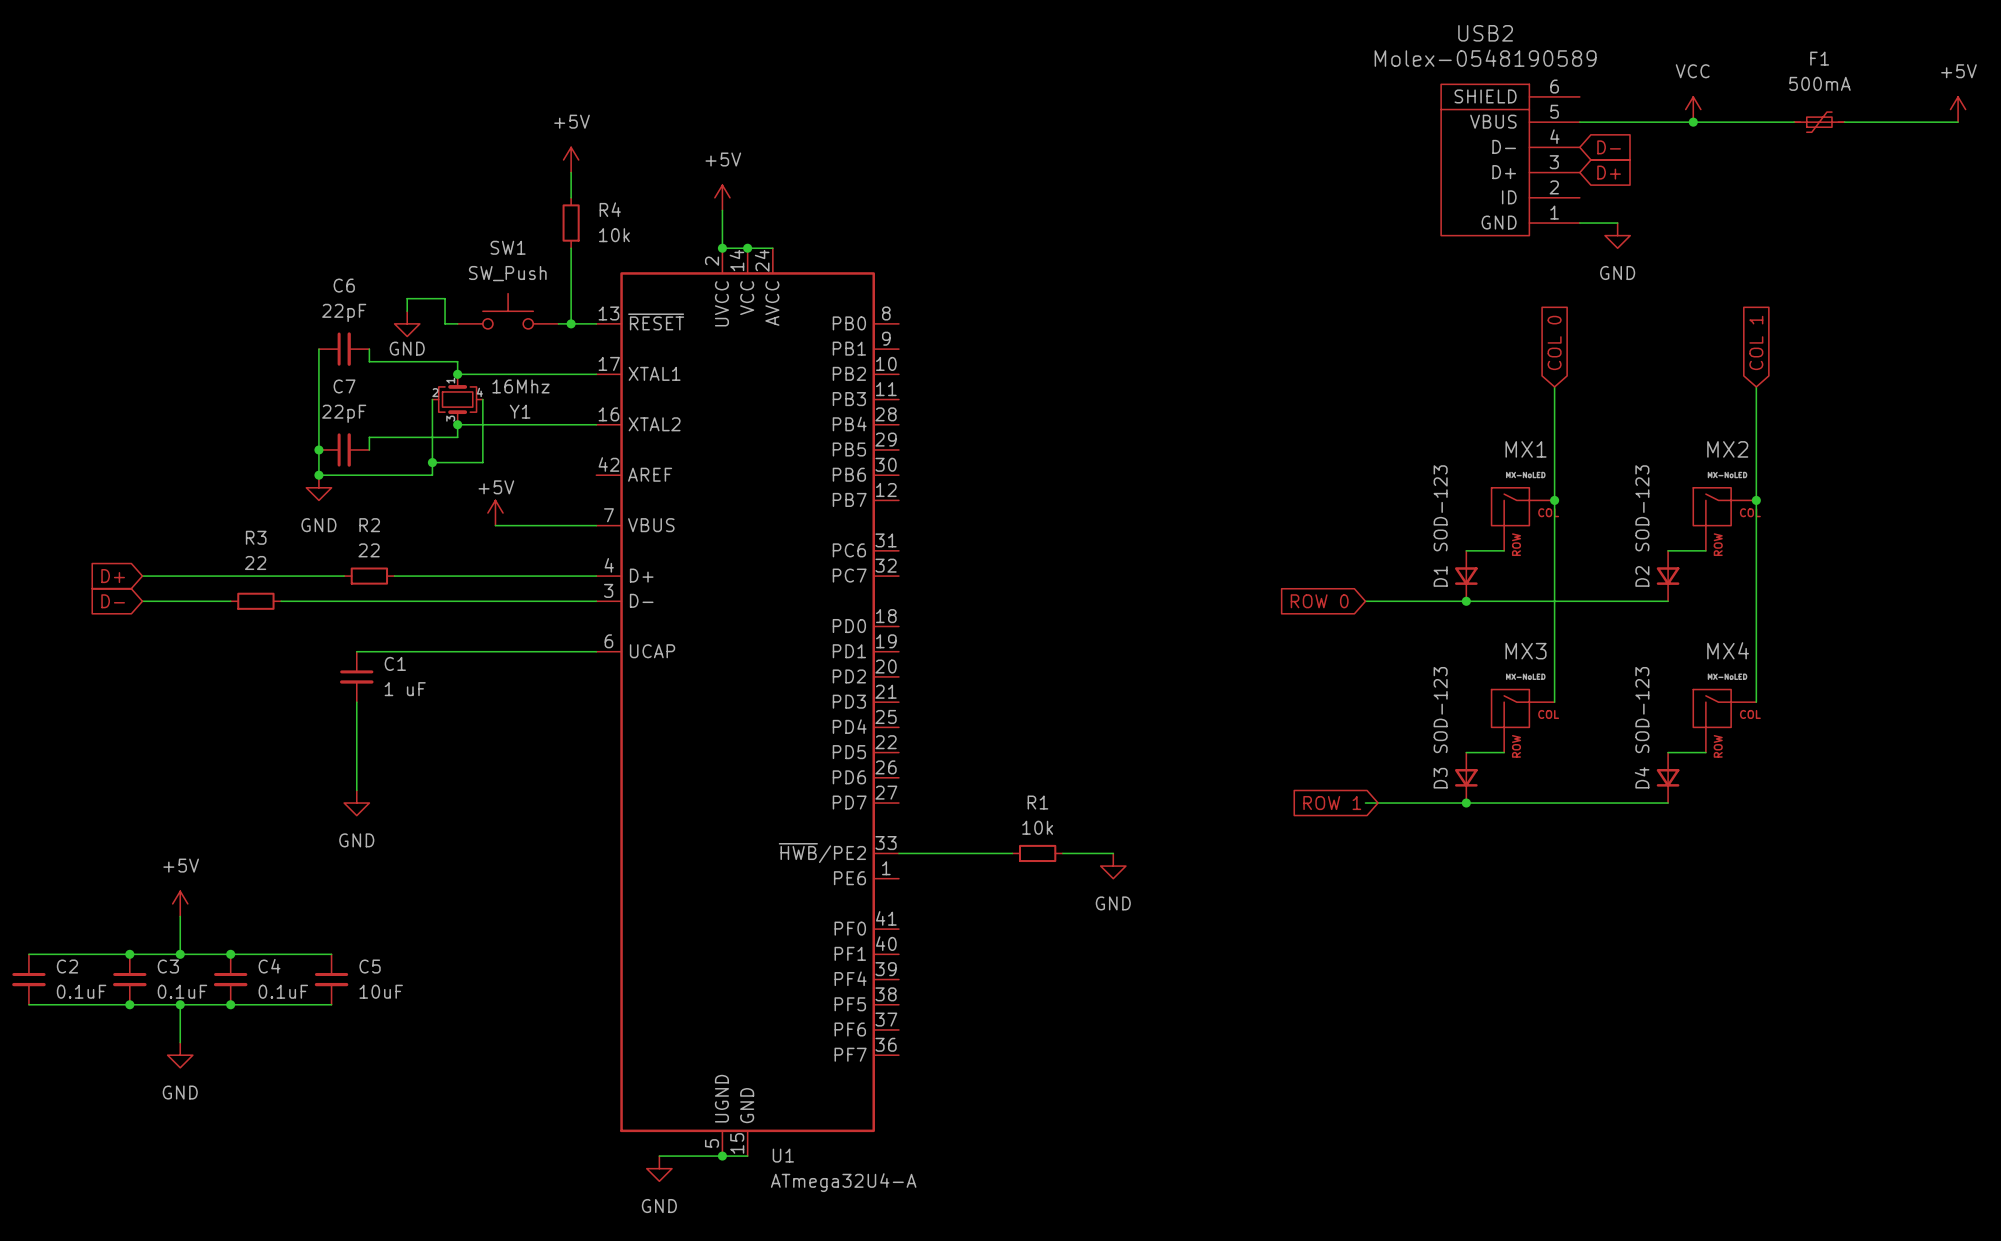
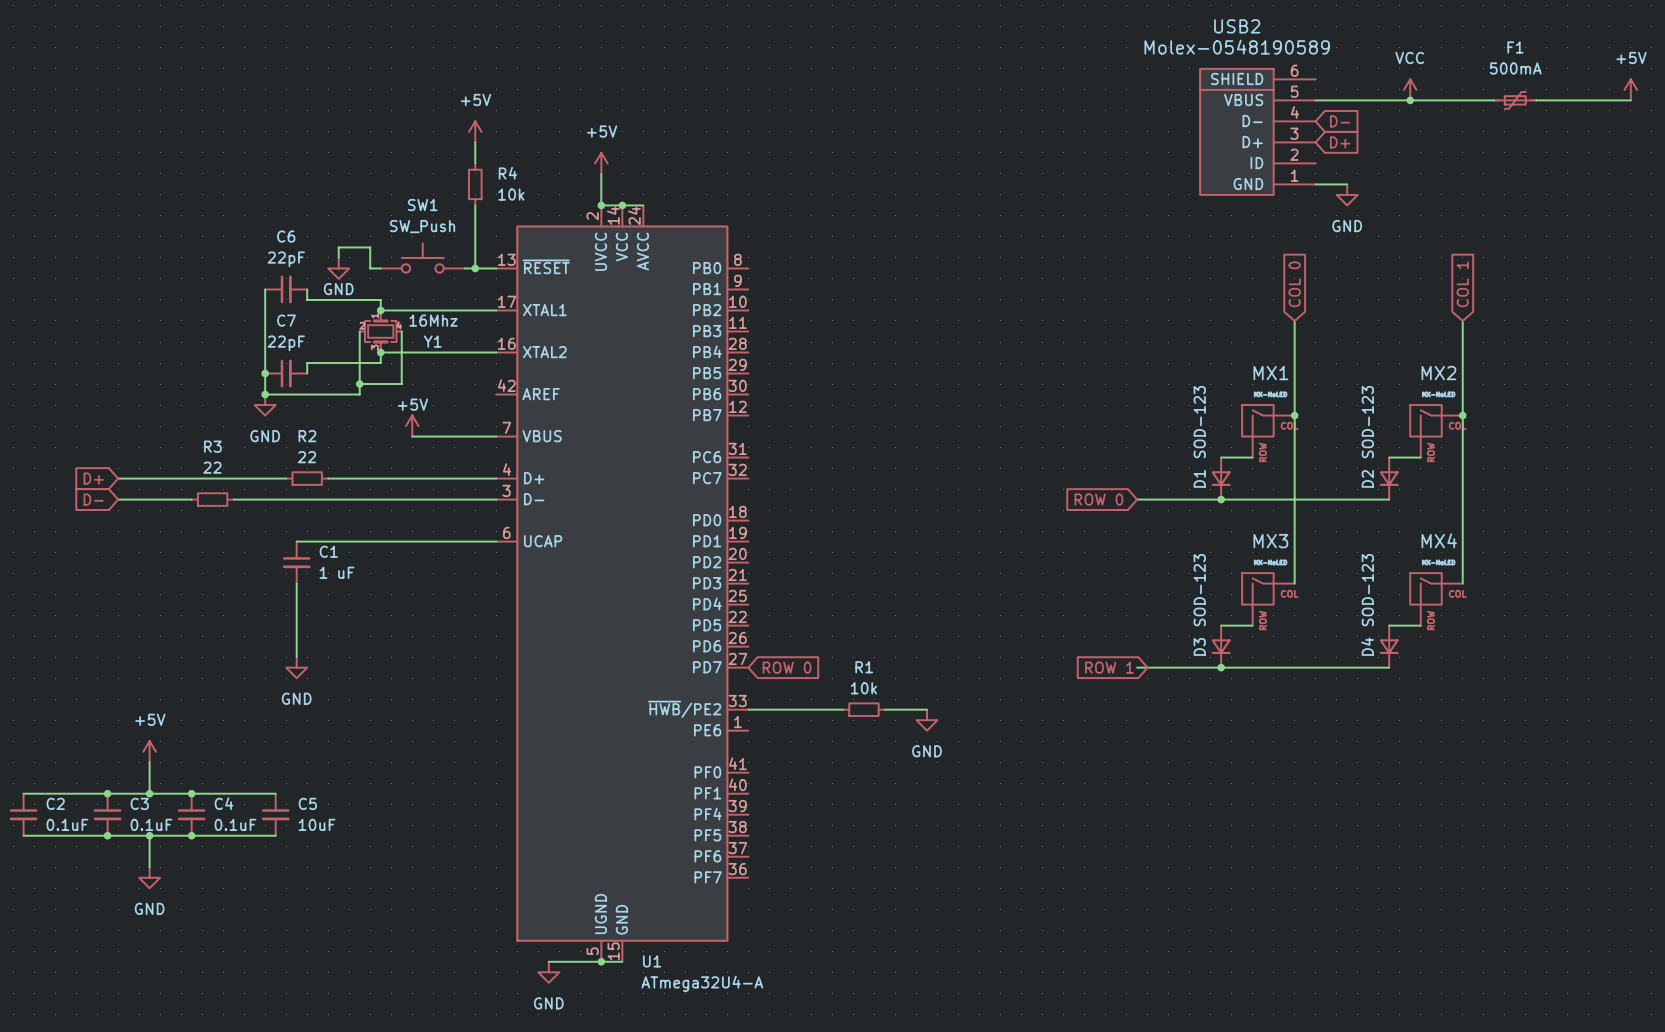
global label: none -> ROW 0 (787, 667)

